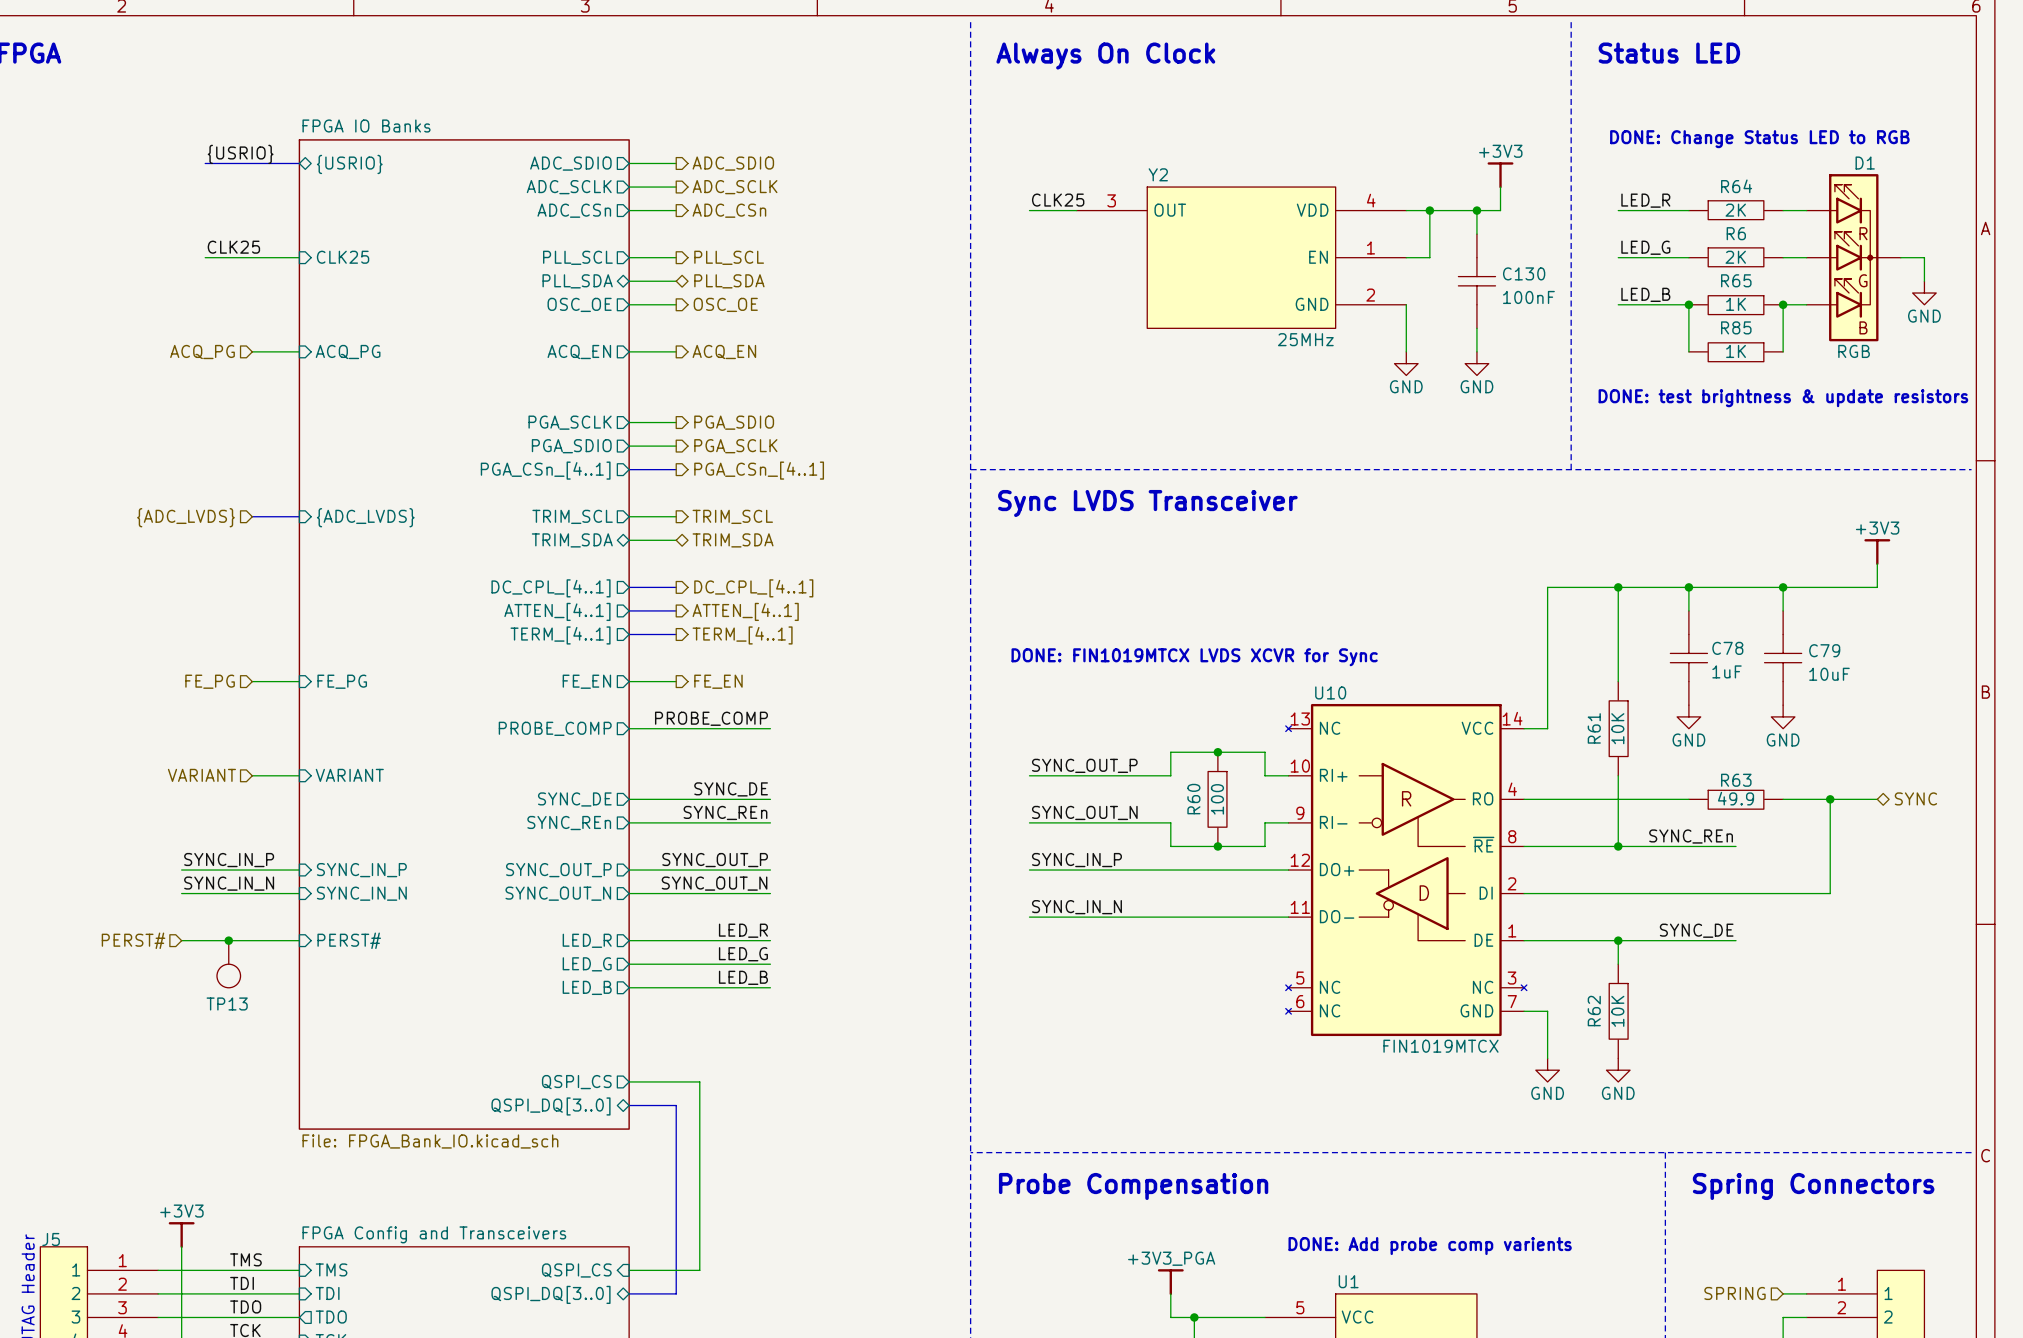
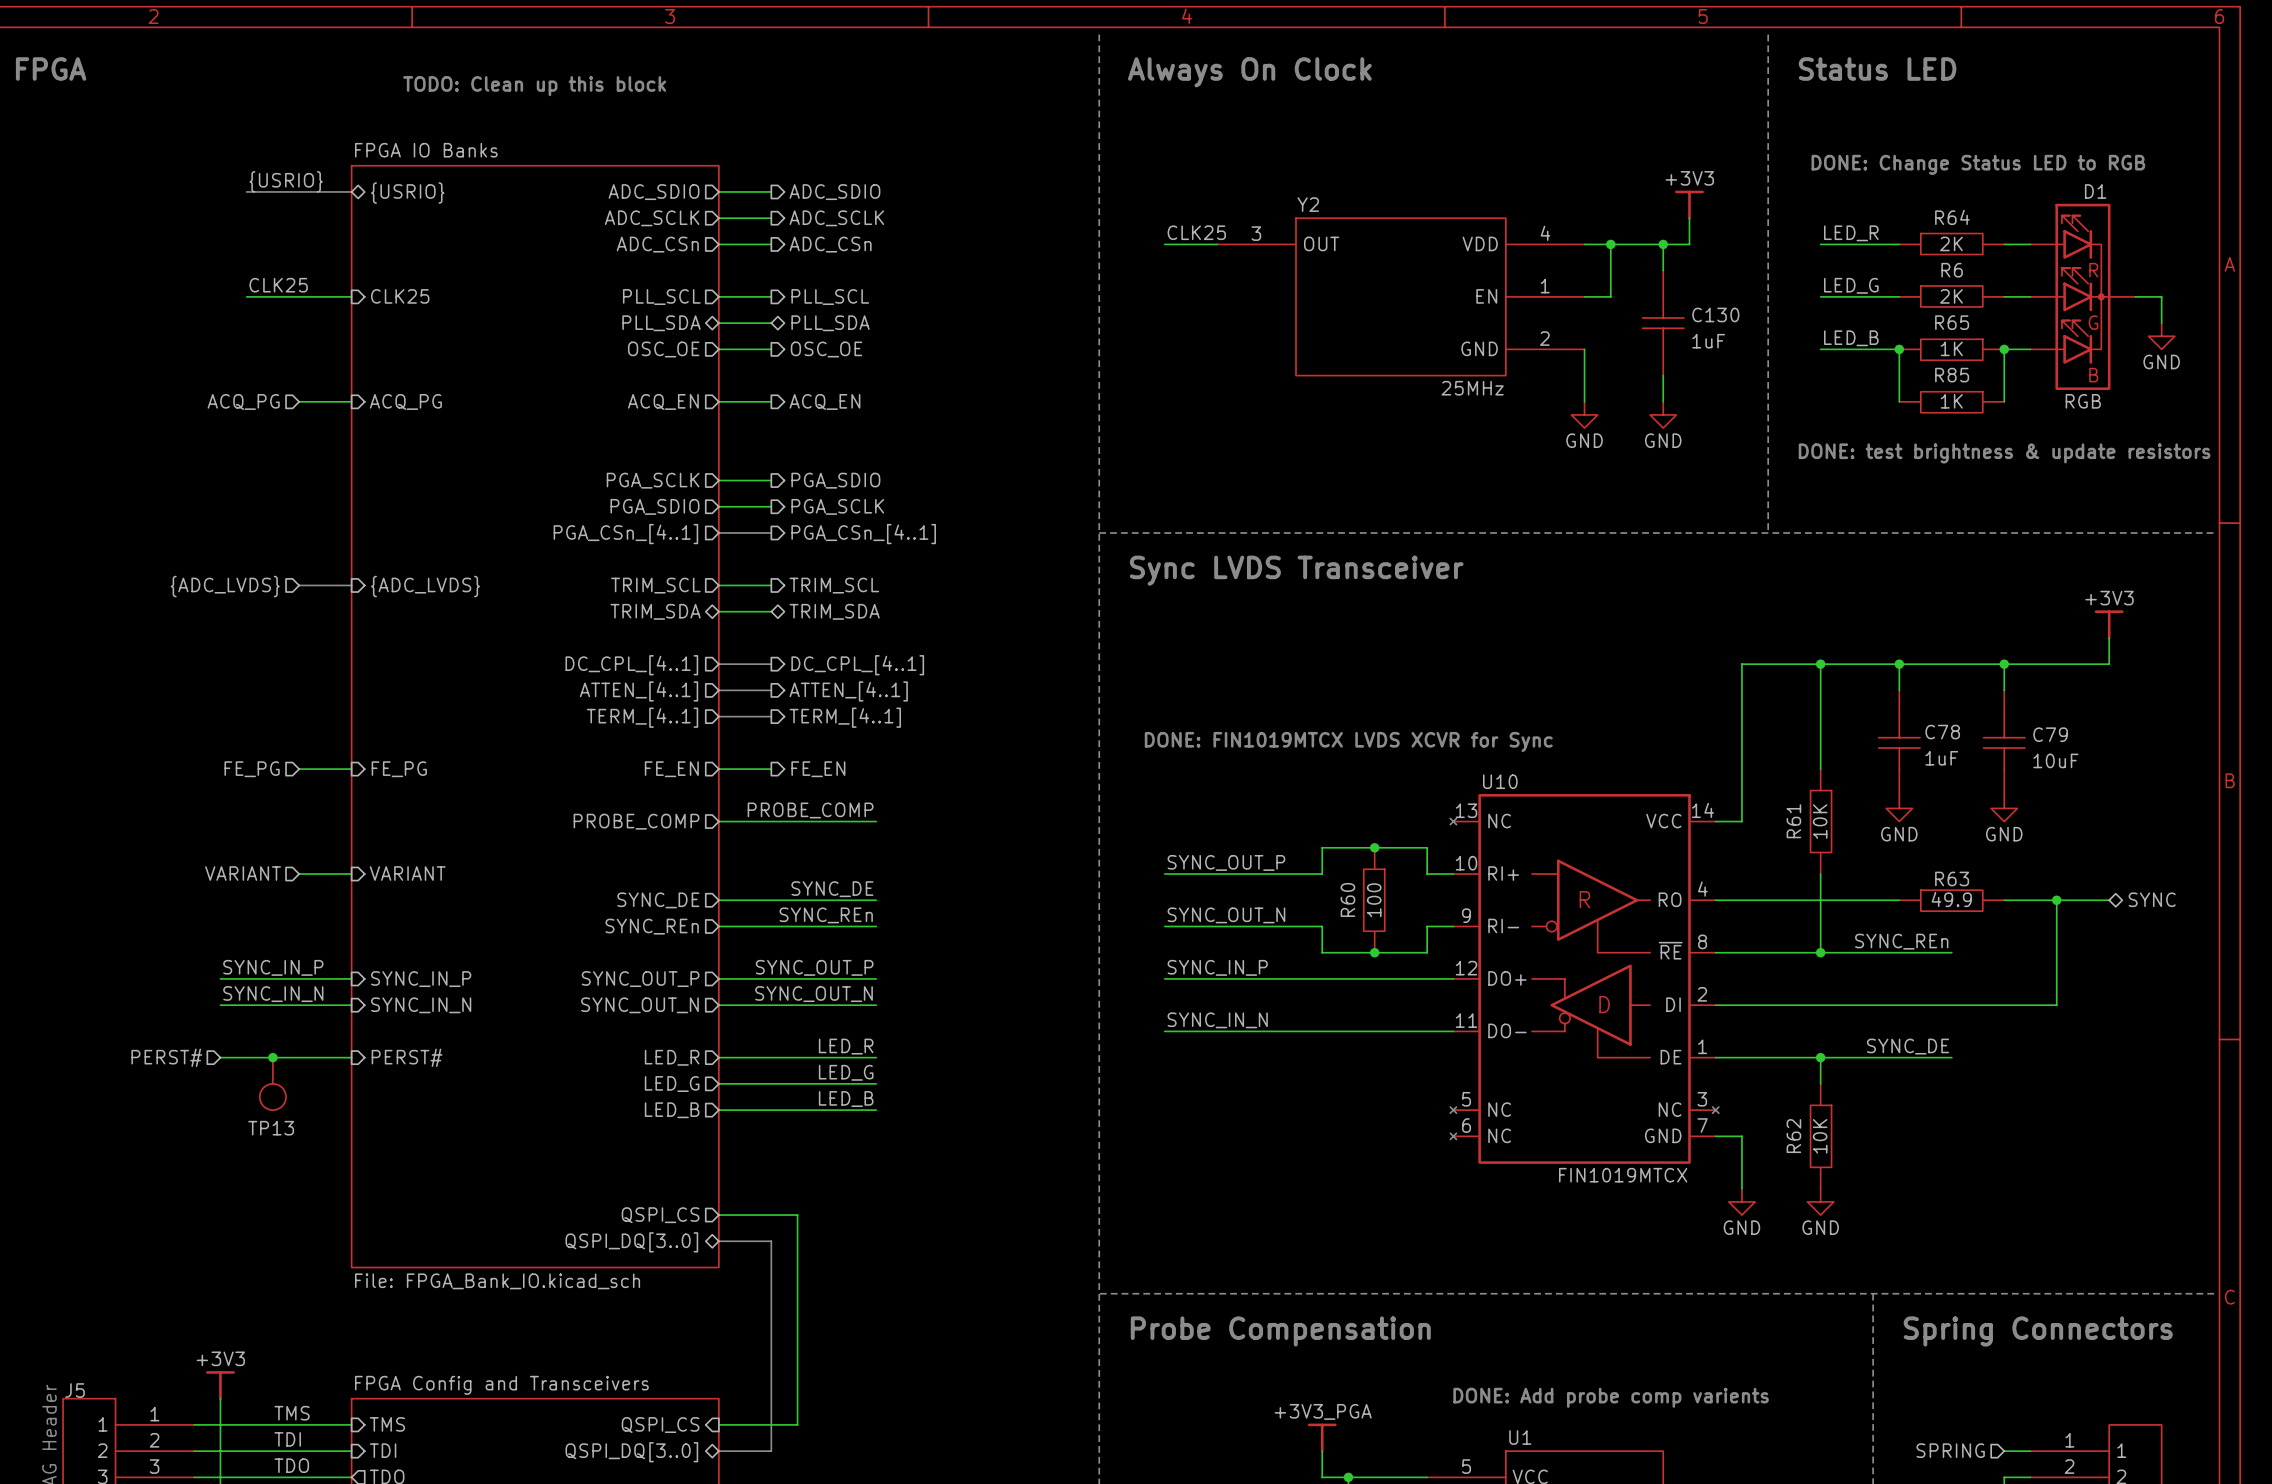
text: none -> TODO: Clean up this block (534, 86)
C130 value: 100nF (1528, 297) -> 1uF (1708, 341)

